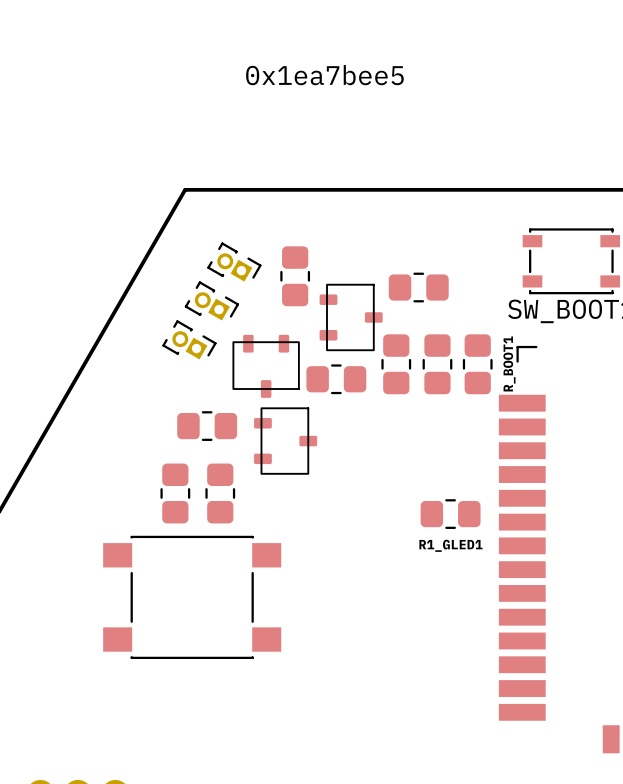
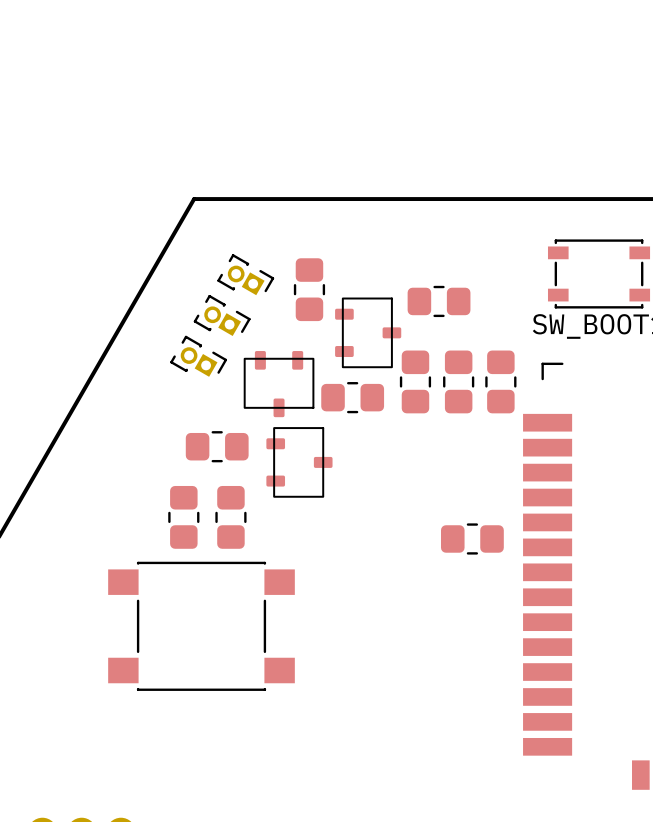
text: 0x1ea7bee5 (324, 75) -> none
R_BOOT1 name: R_BOOT1 (509, 363) -> none
R1_GLED1 name: R1_GLED1 (450, 545) -> none

